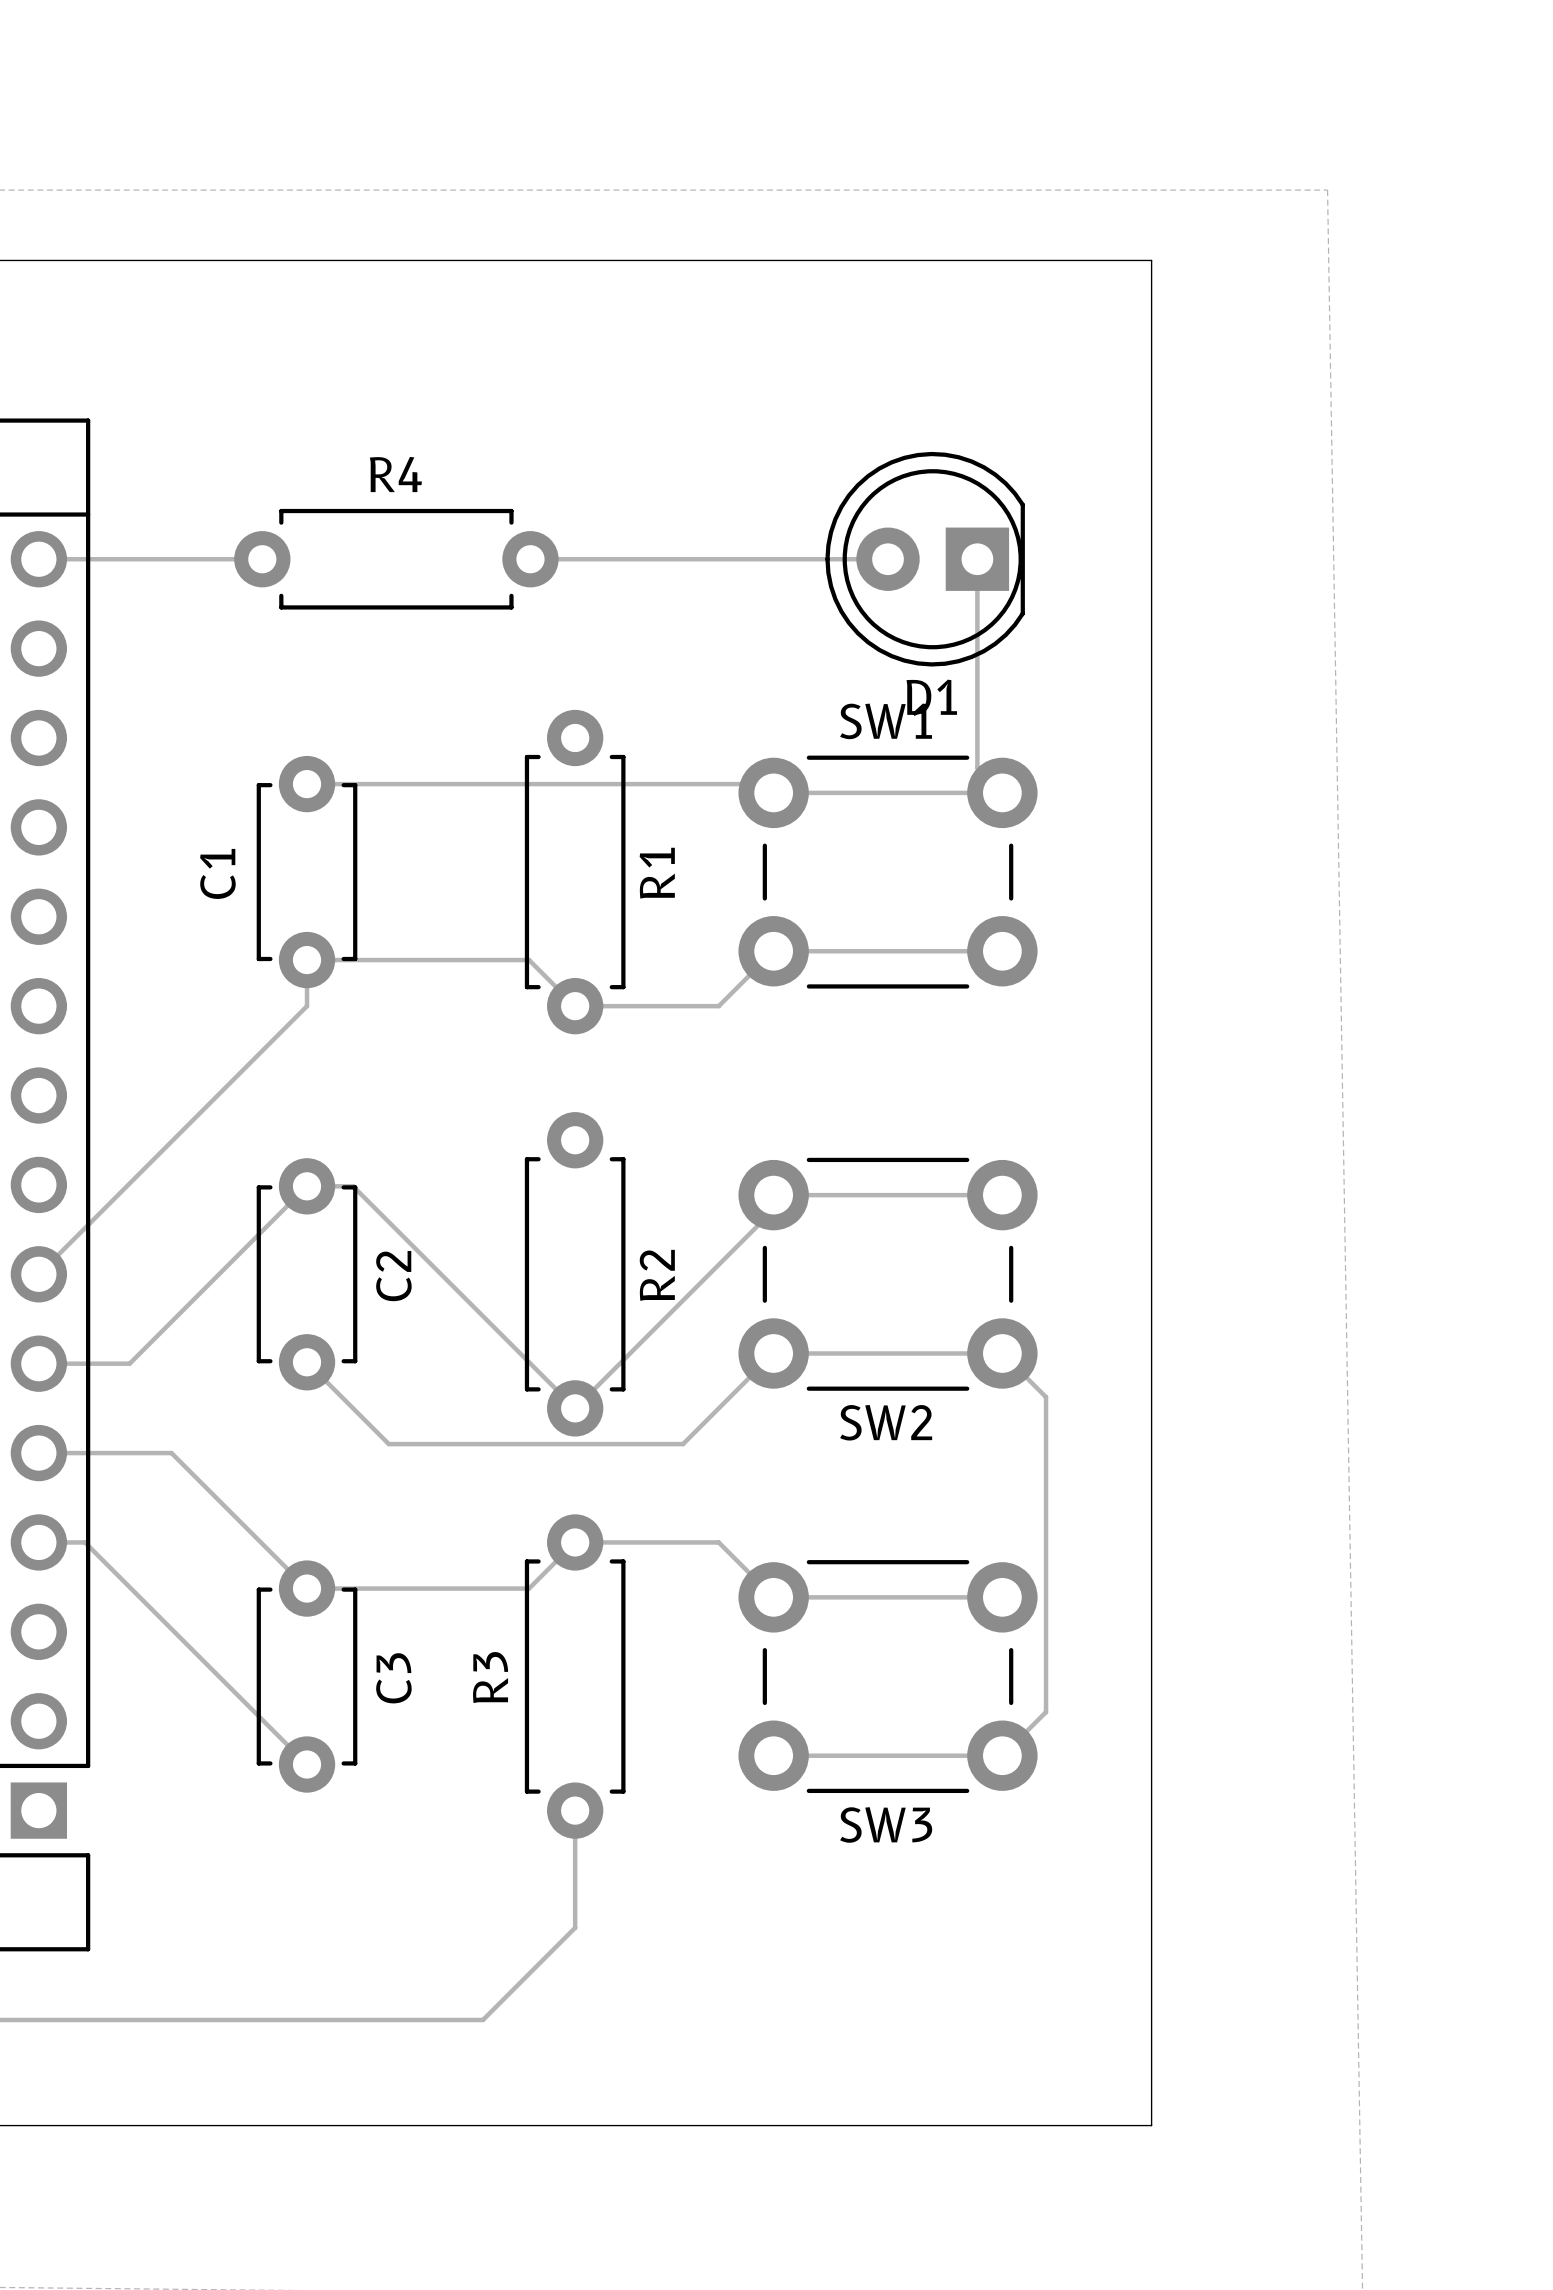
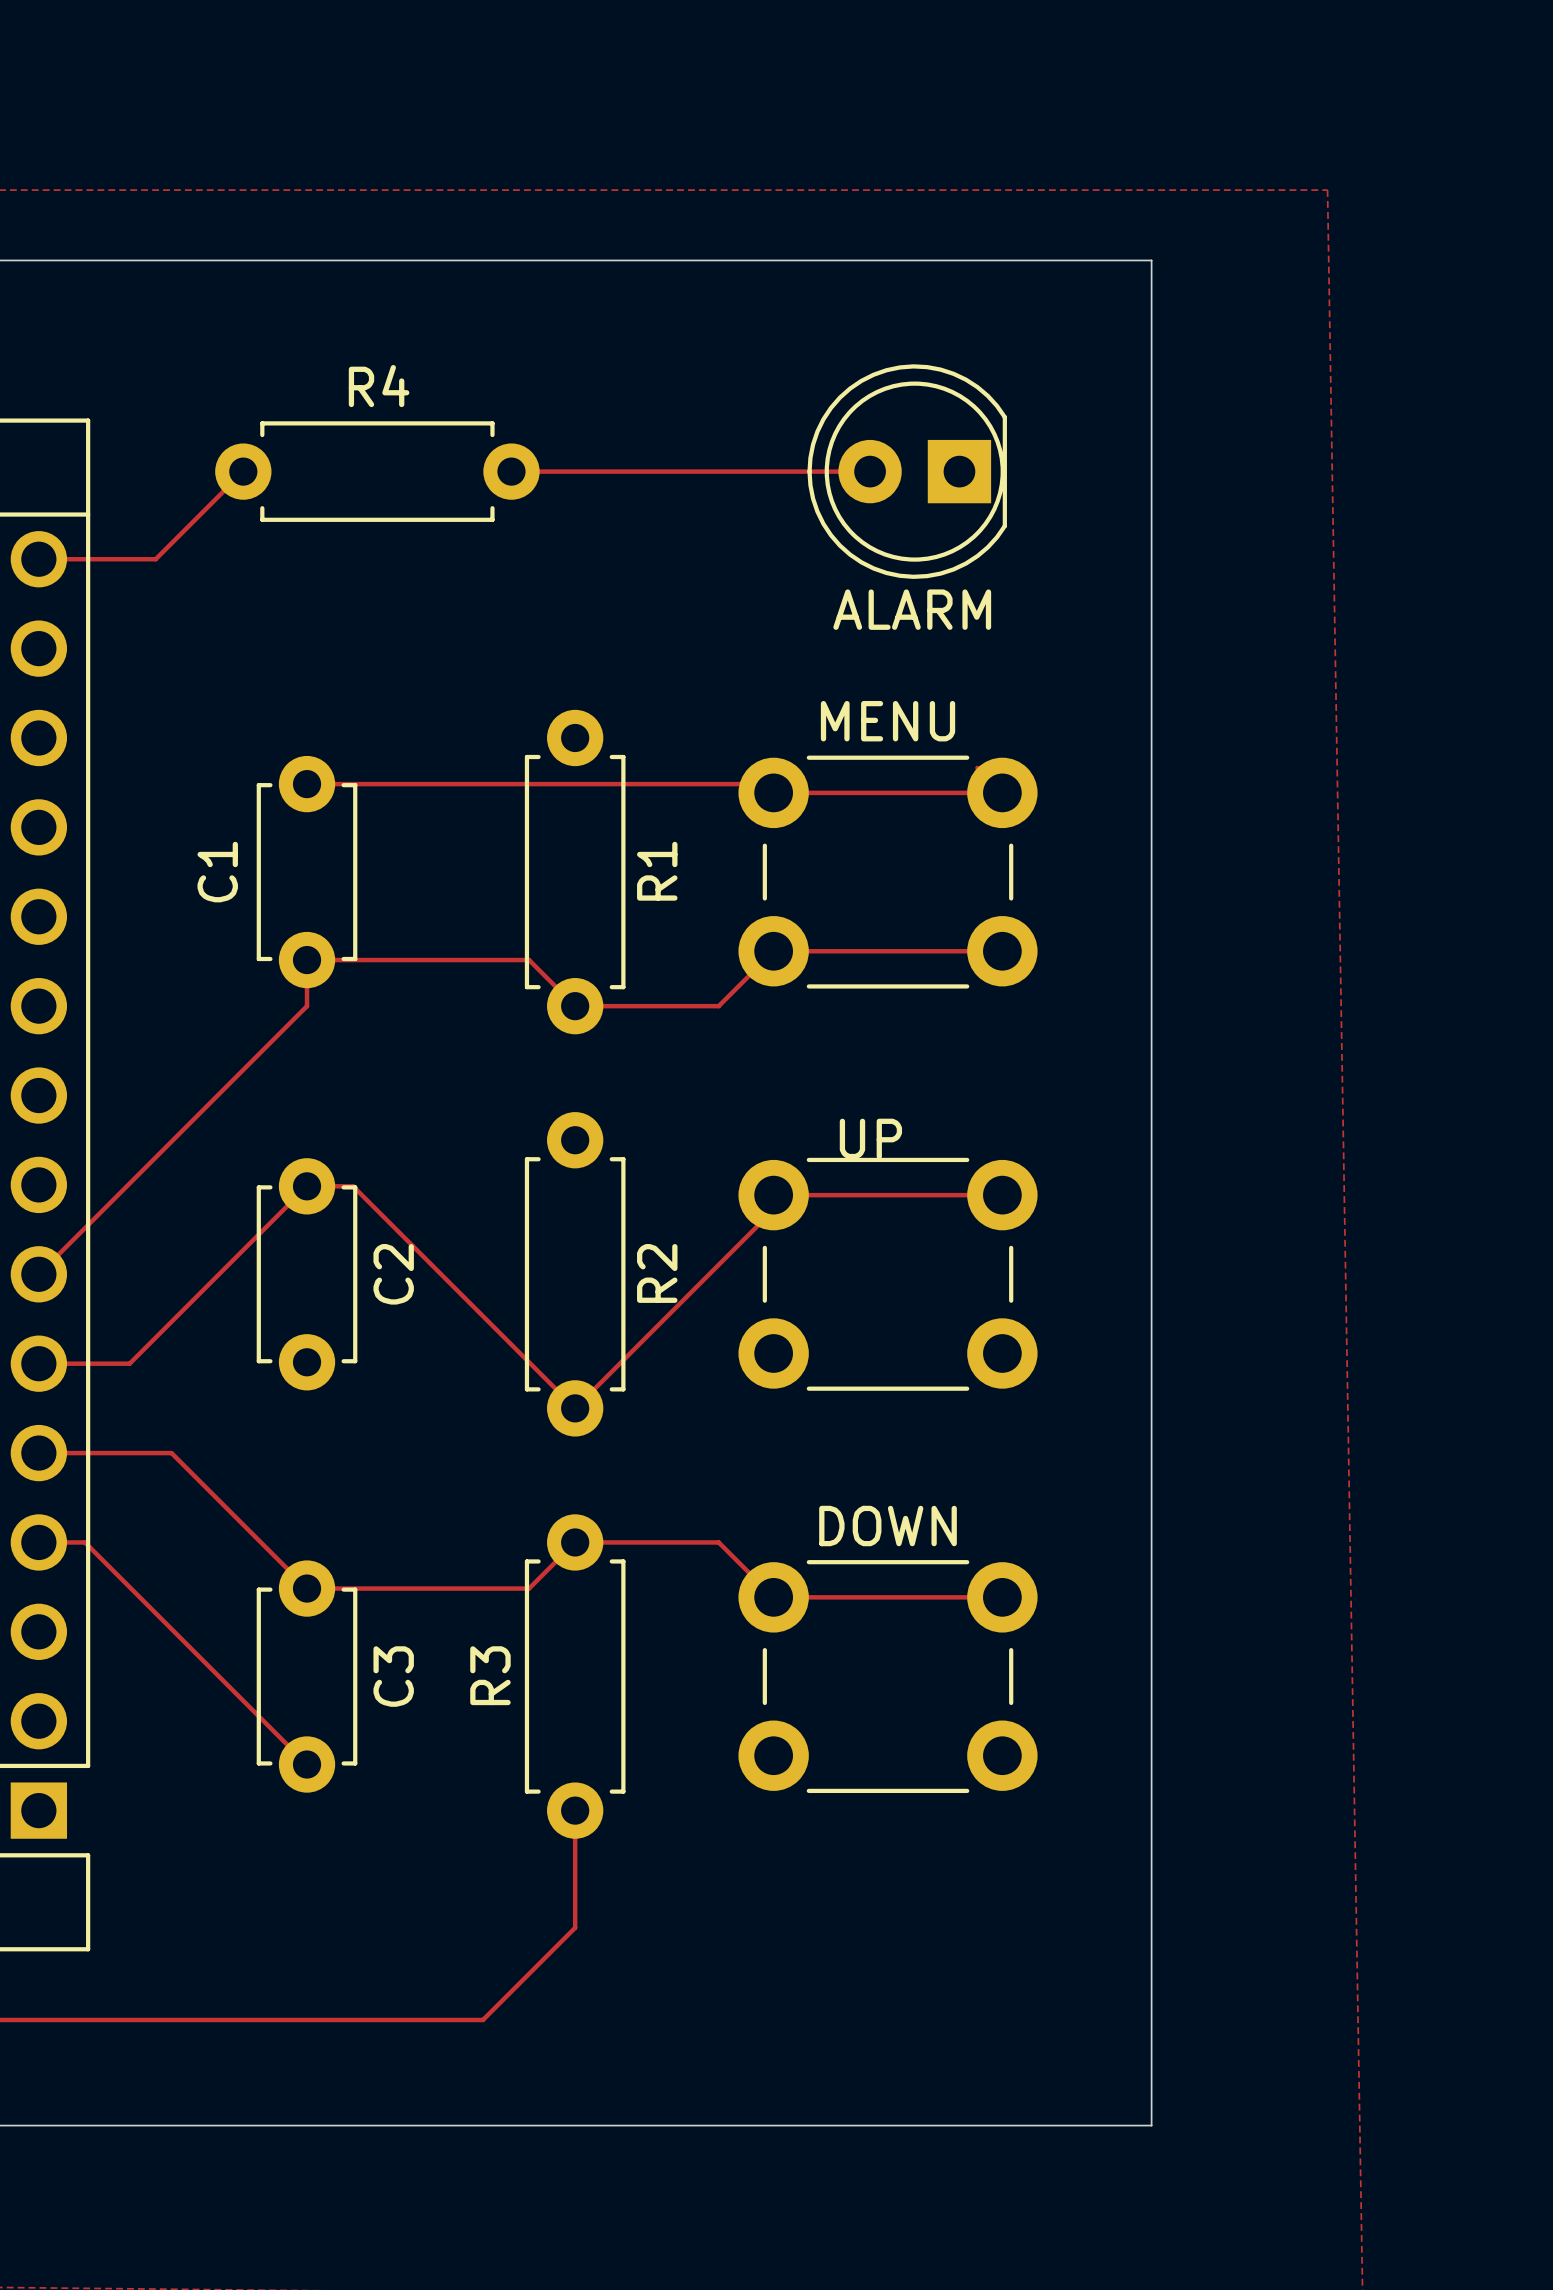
track: none -> (511, 471) (870, 471)
ALARM: none -> (907, 471)
track: (155, 559) (262, 559) -> (155, 559) (243, 471)
R4 position: (396, 559) -> (377, 471)
track: (530, 559) (888, 559) -> none
D1: (925, 559) -> none
track: (977, 559) (977, 767) -> none
SW1 name: SW1 (886, 721) -> MENU (888, 721)
track: (307, 1362) (388, 1444) (683, 1444) (773, 1353) (1002, 1353) (1046, 1397) (1046, 1712) (1002, 1755) (773, 1755) -> none
SW2 name: SW2 (886, 1422) -> UP (870, 1138)
SW3 name: SW3 (886, 1824) -> DOWN (888, 1526)

